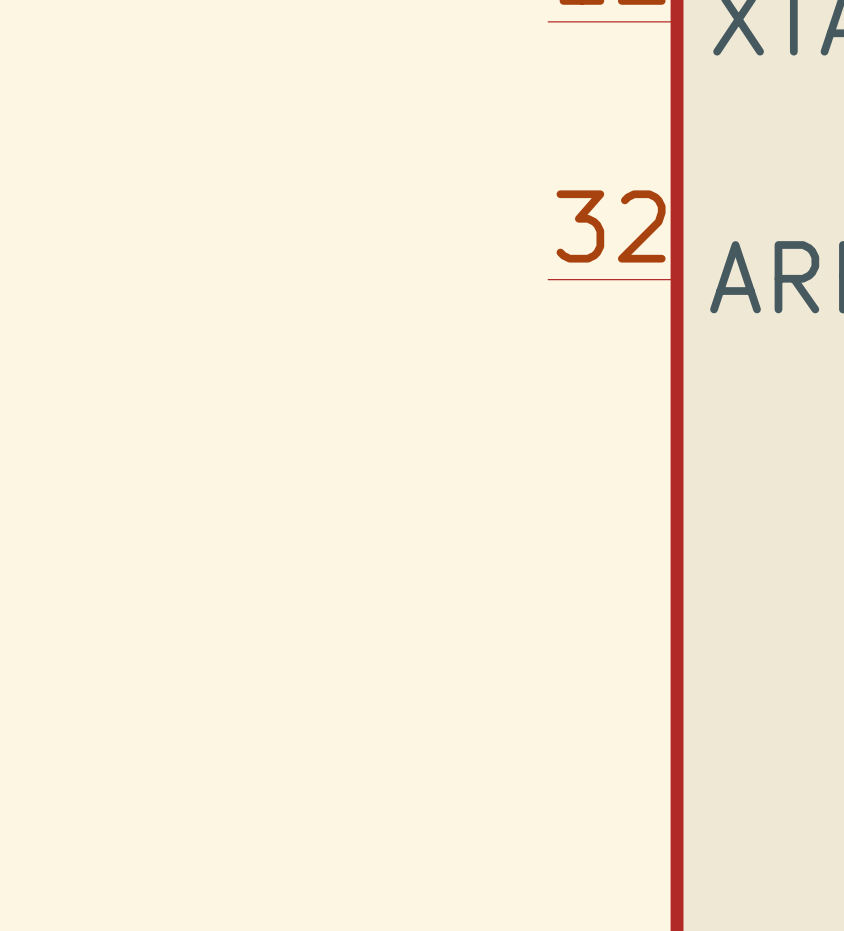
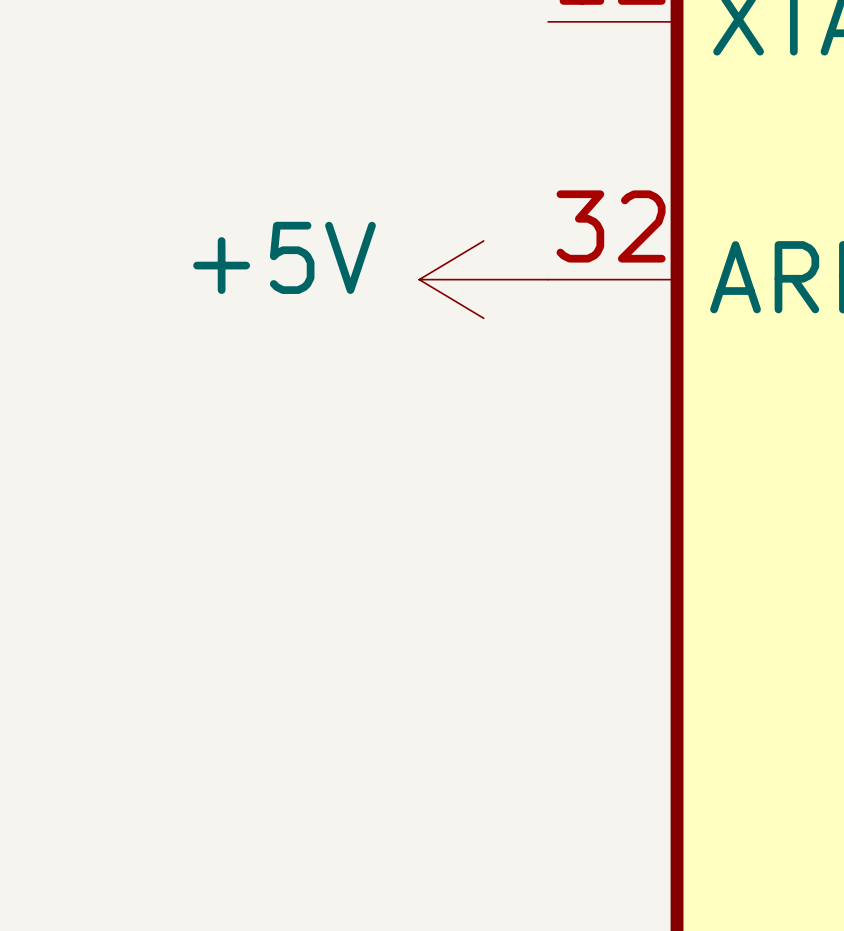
power symbol: none -> +5V (483, 279)

